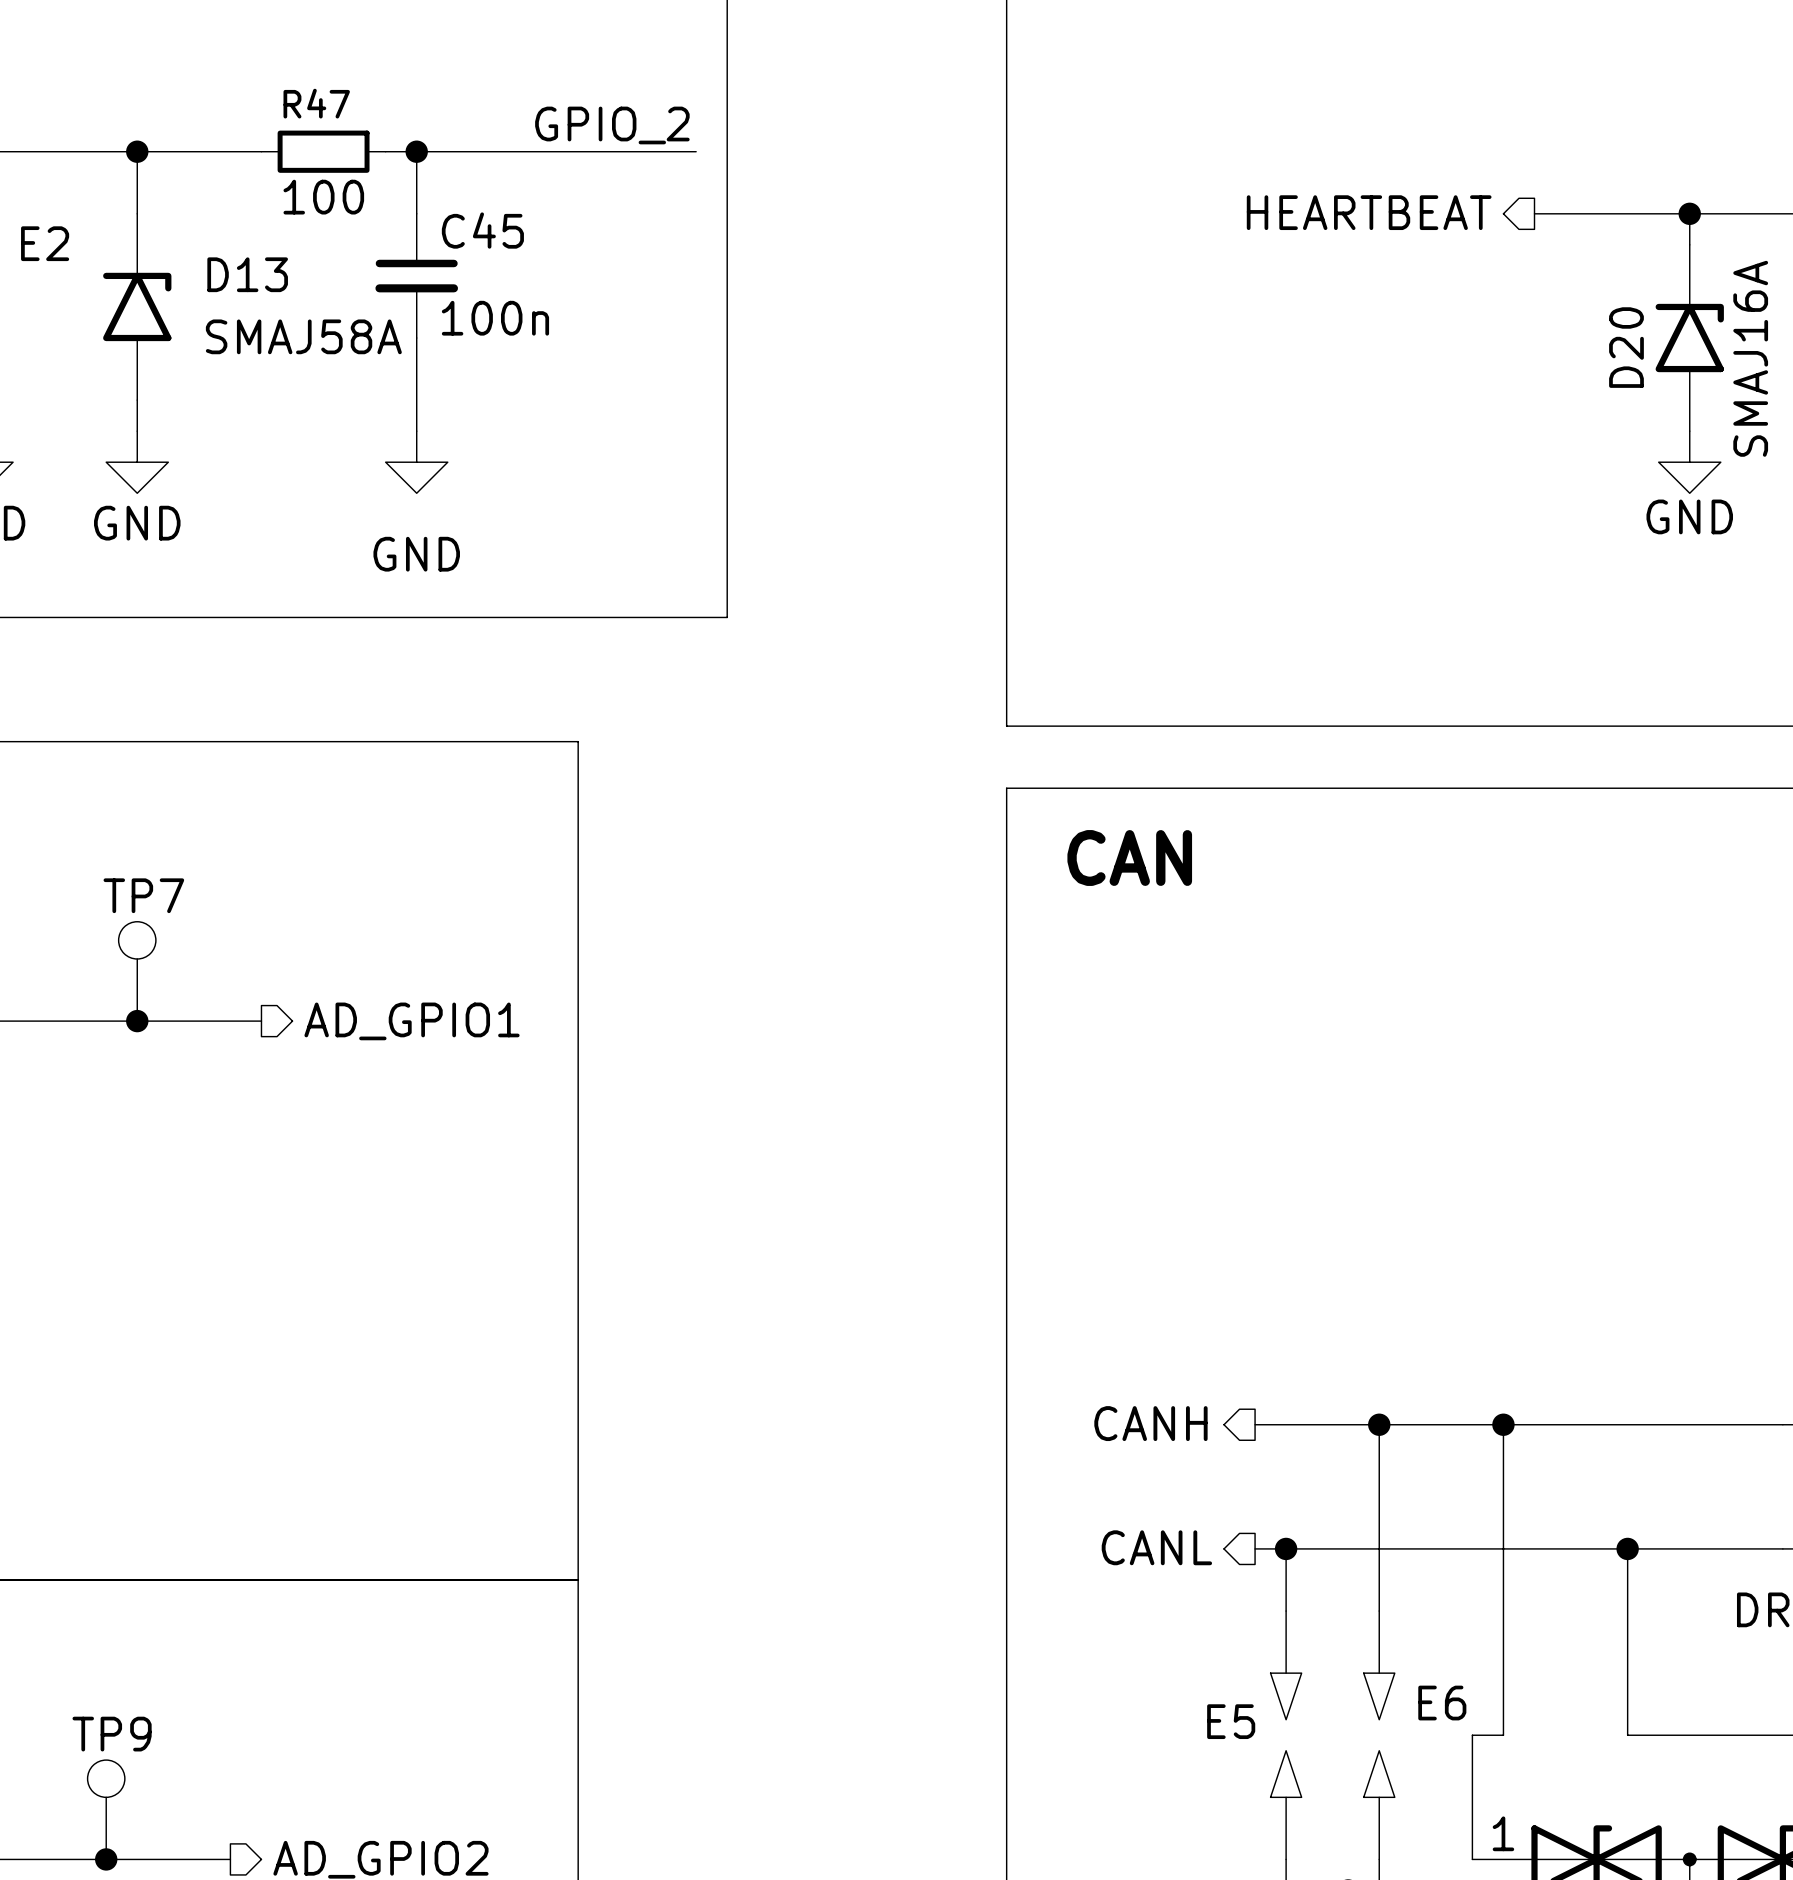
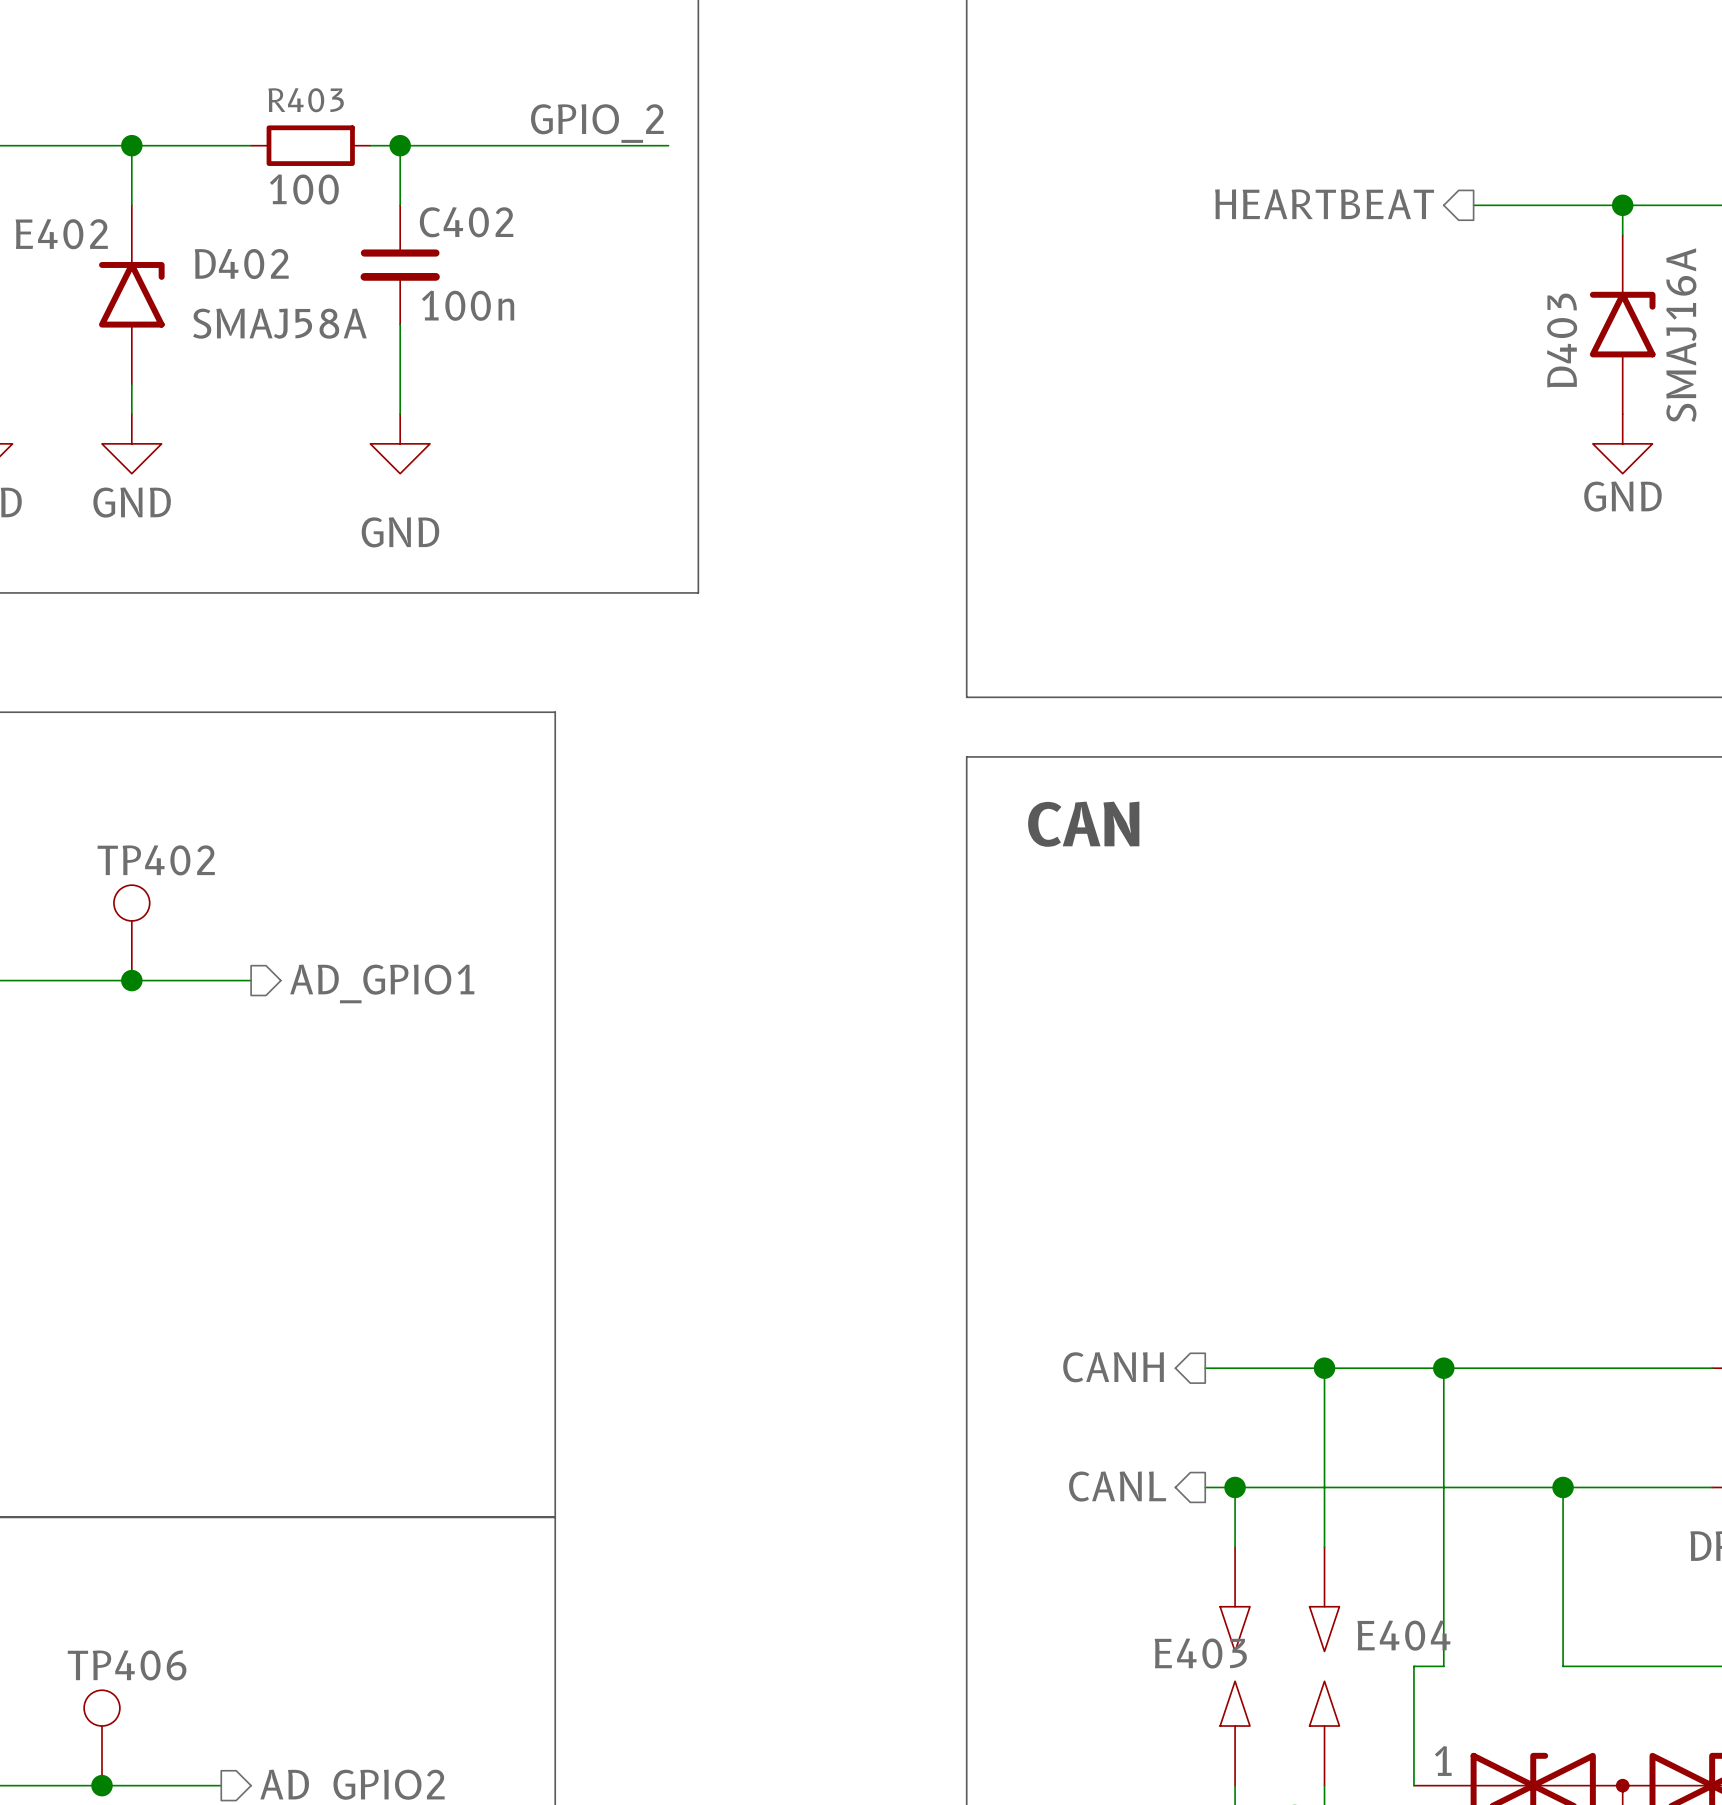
R47 name: R47 (316, 103) -> R403 (306, 100)
C45 name: C45 (482, 230) -> C402 (466, 222)
E2 name: E2 (45, 243) -> E402 (61, 234)
D13 name: D13 (247, 274) -> D402 (241, 264)
D20 name: D20 (1626, 347) -> D403 (1562, 340)
TP7 name: TP7 (143, 895) -> TP402 (156, 860)
E6 name: E6 (1442, 1703) -> E404 (1403, 1635)
E5 name: E5 (1231, 1721) -> E403 (1200, 1653)
TP9 name: TP9 (112, 1734) -> TP406 (127, 1665)

